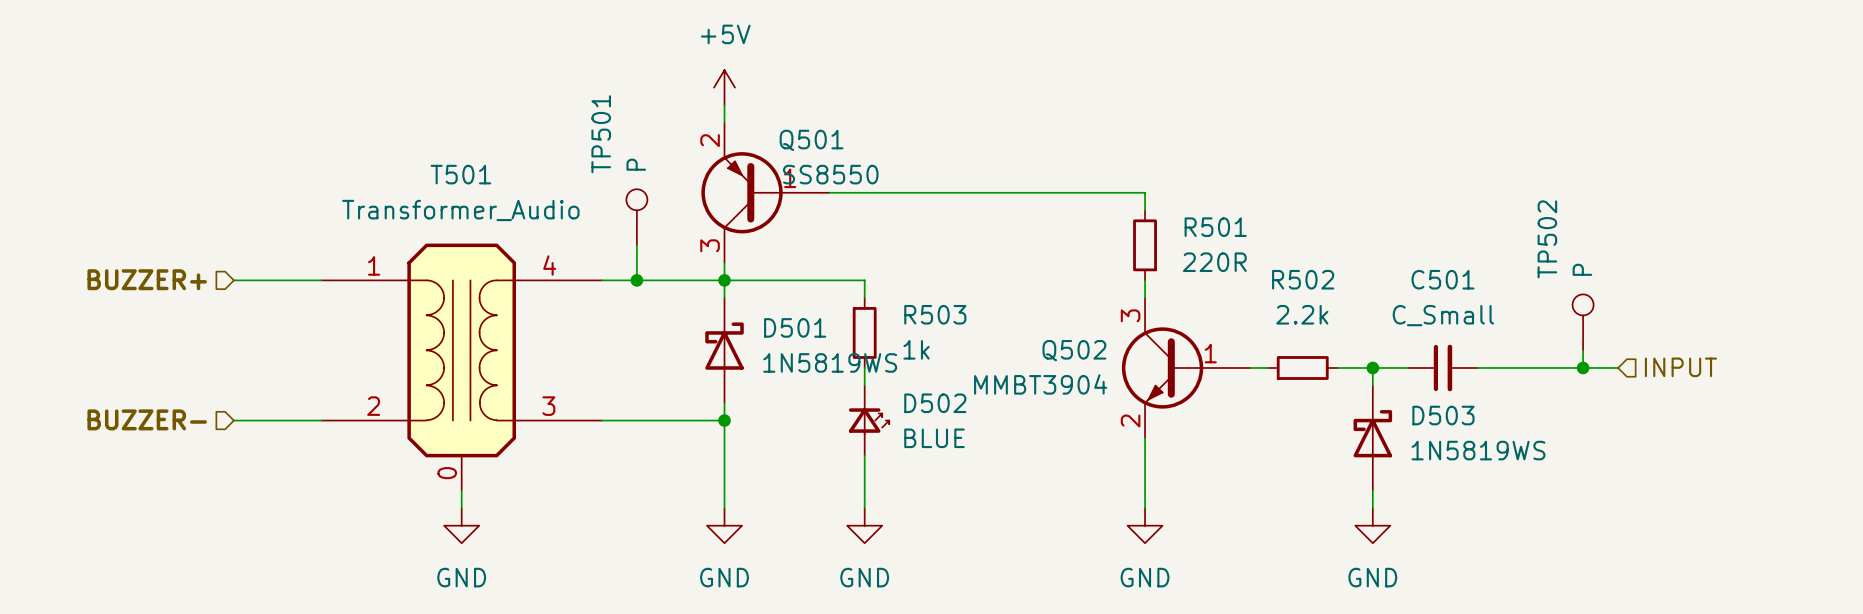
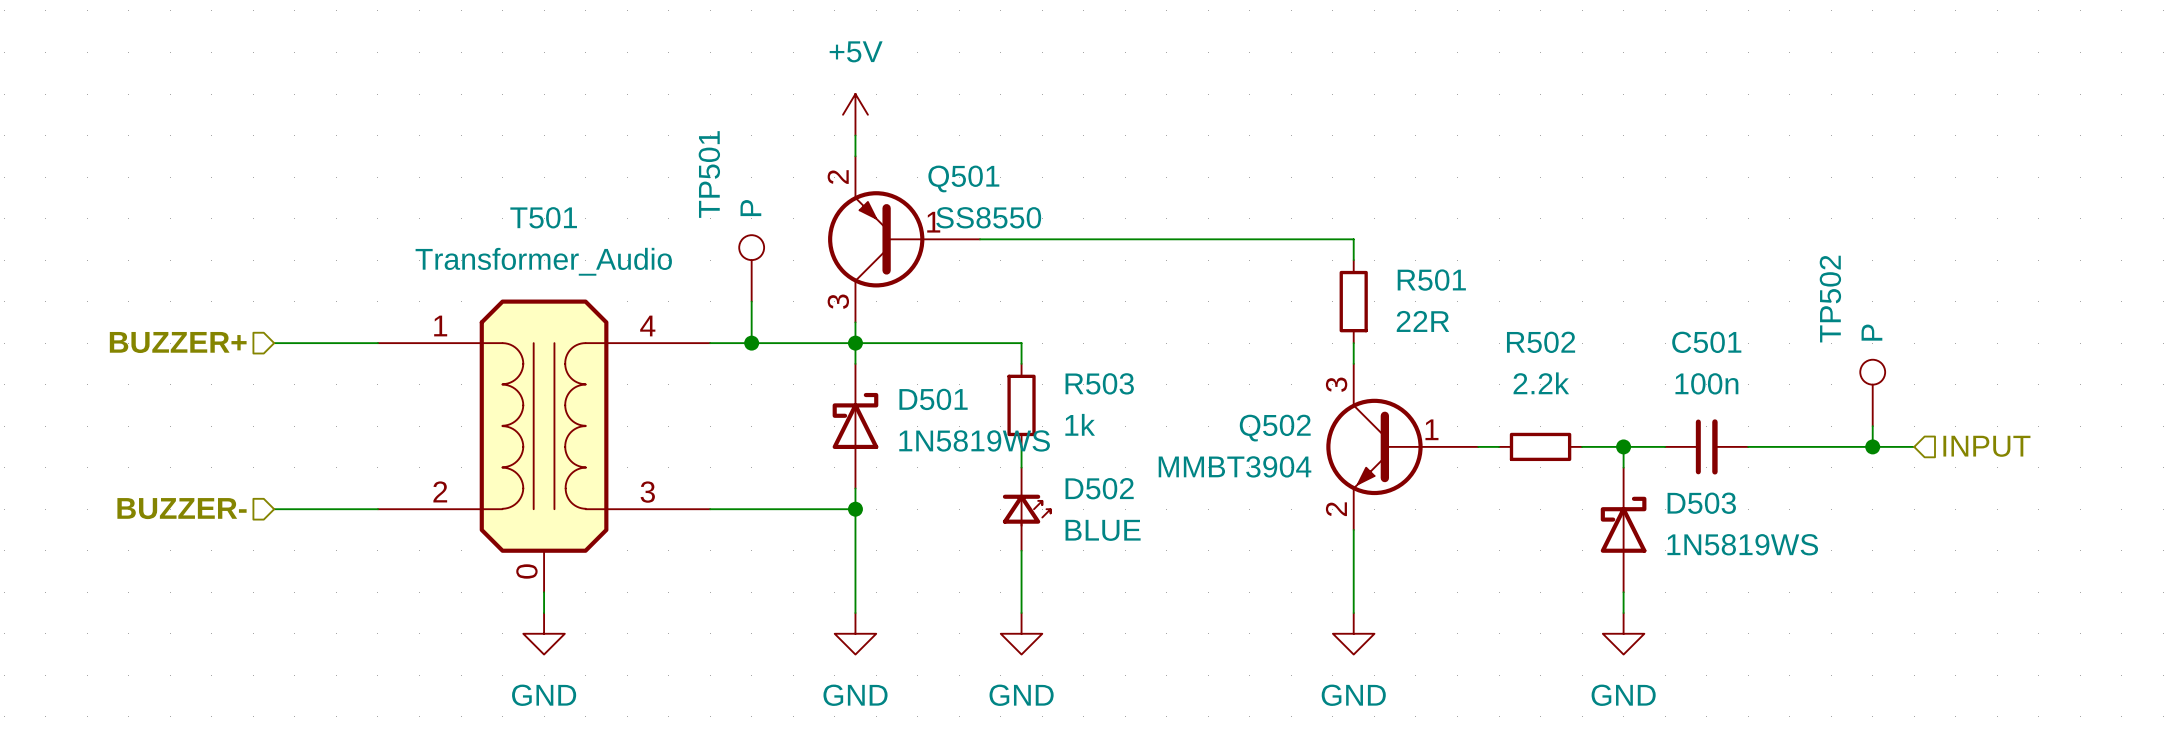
R501 value: 220R (1214, 262) -> 22R (1422, 321)
C501 value: C_Small (1443, 315) -> 100n (1706, 383)

